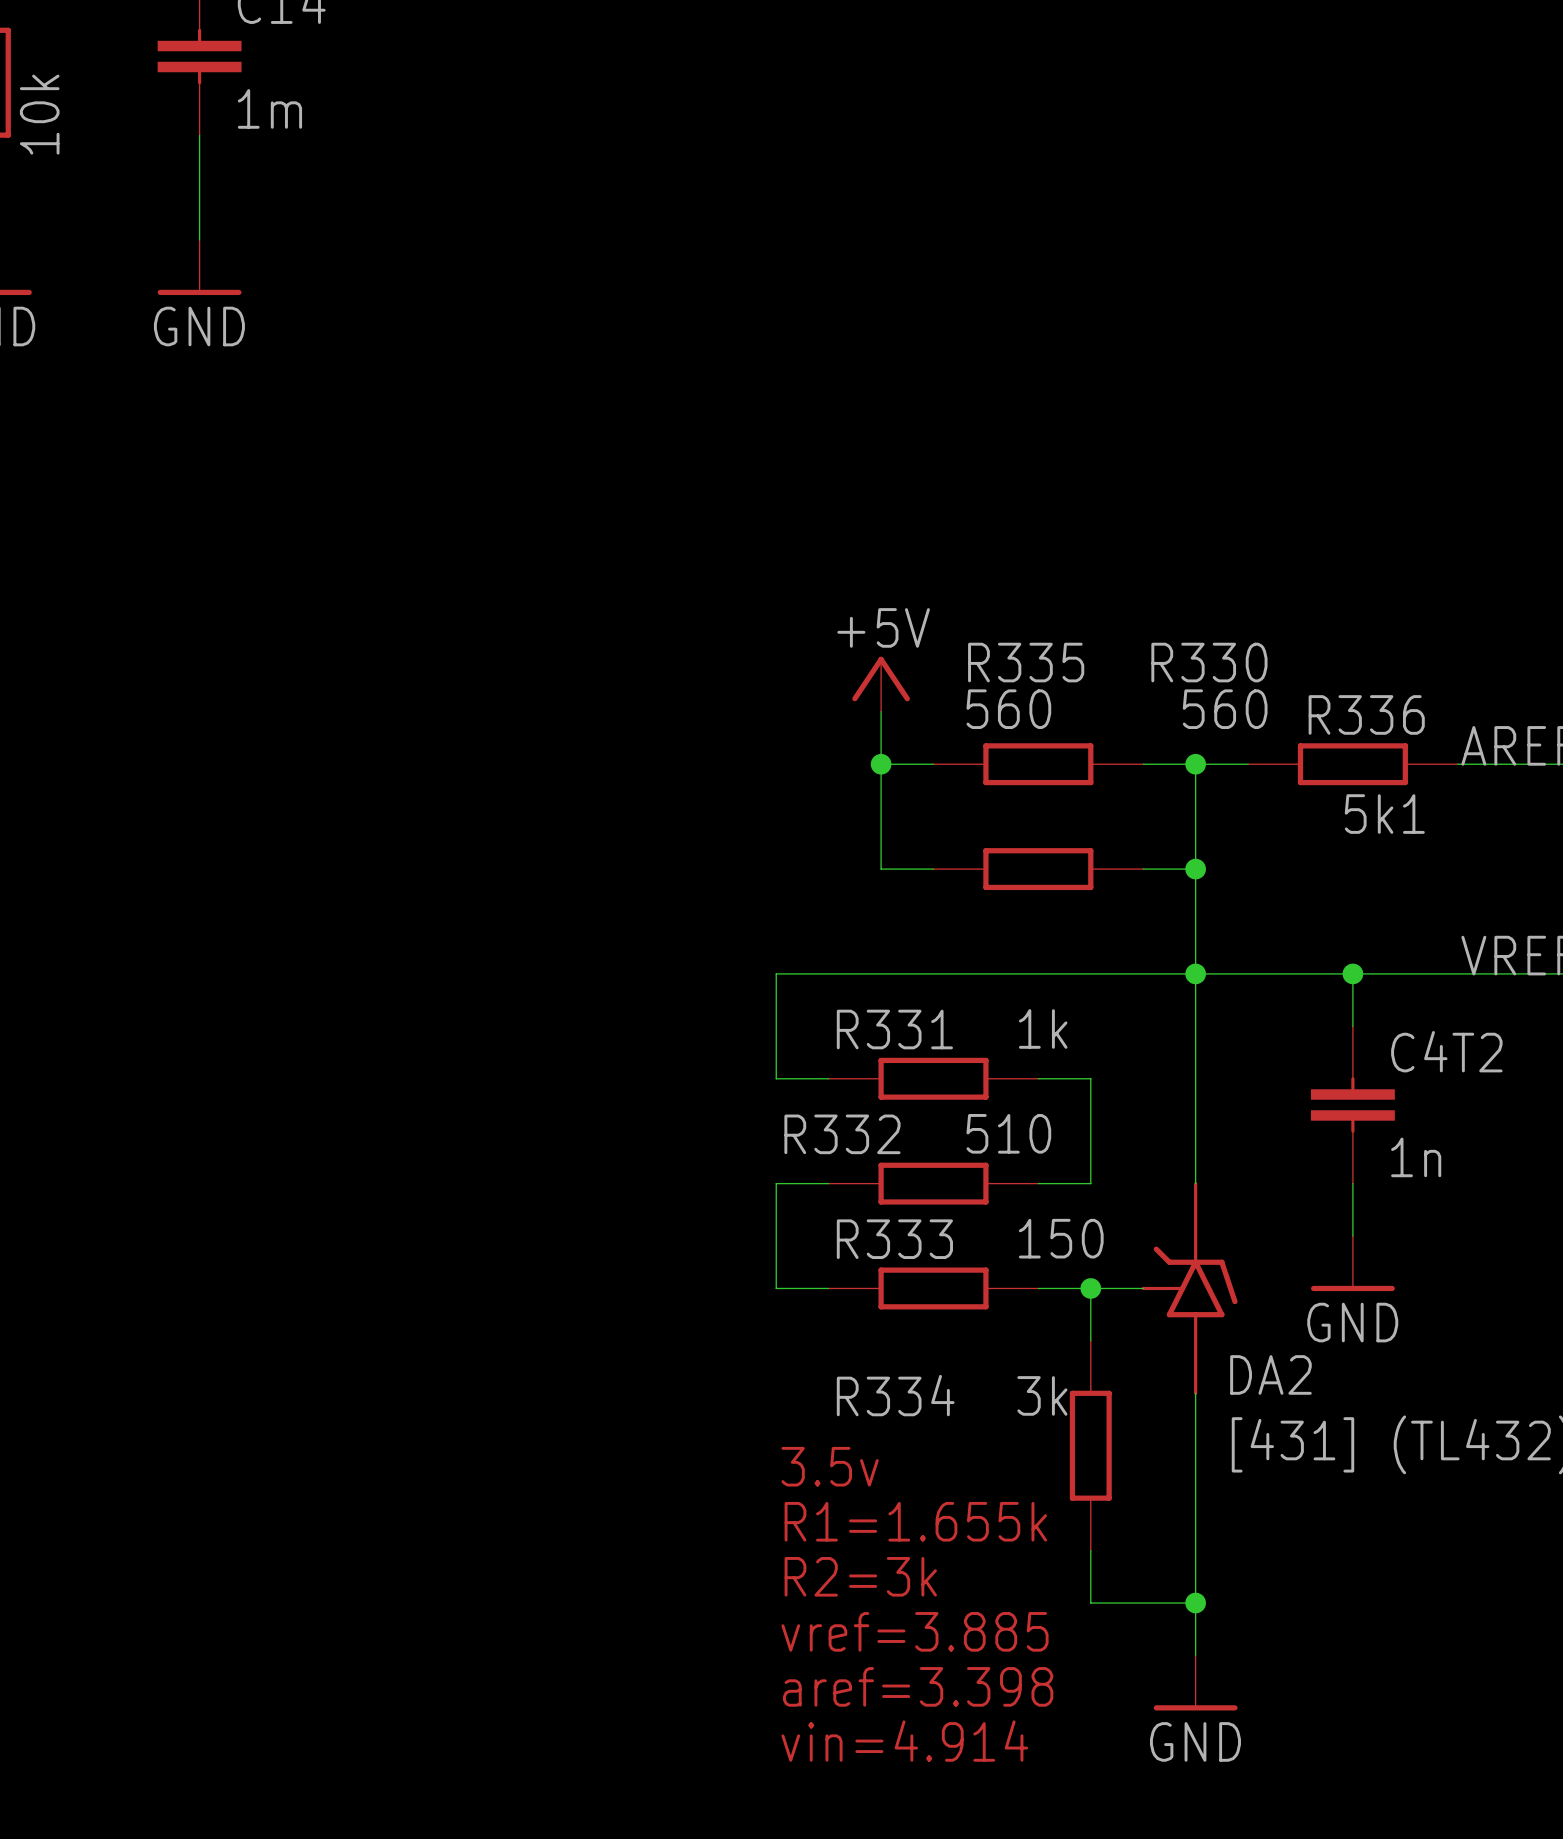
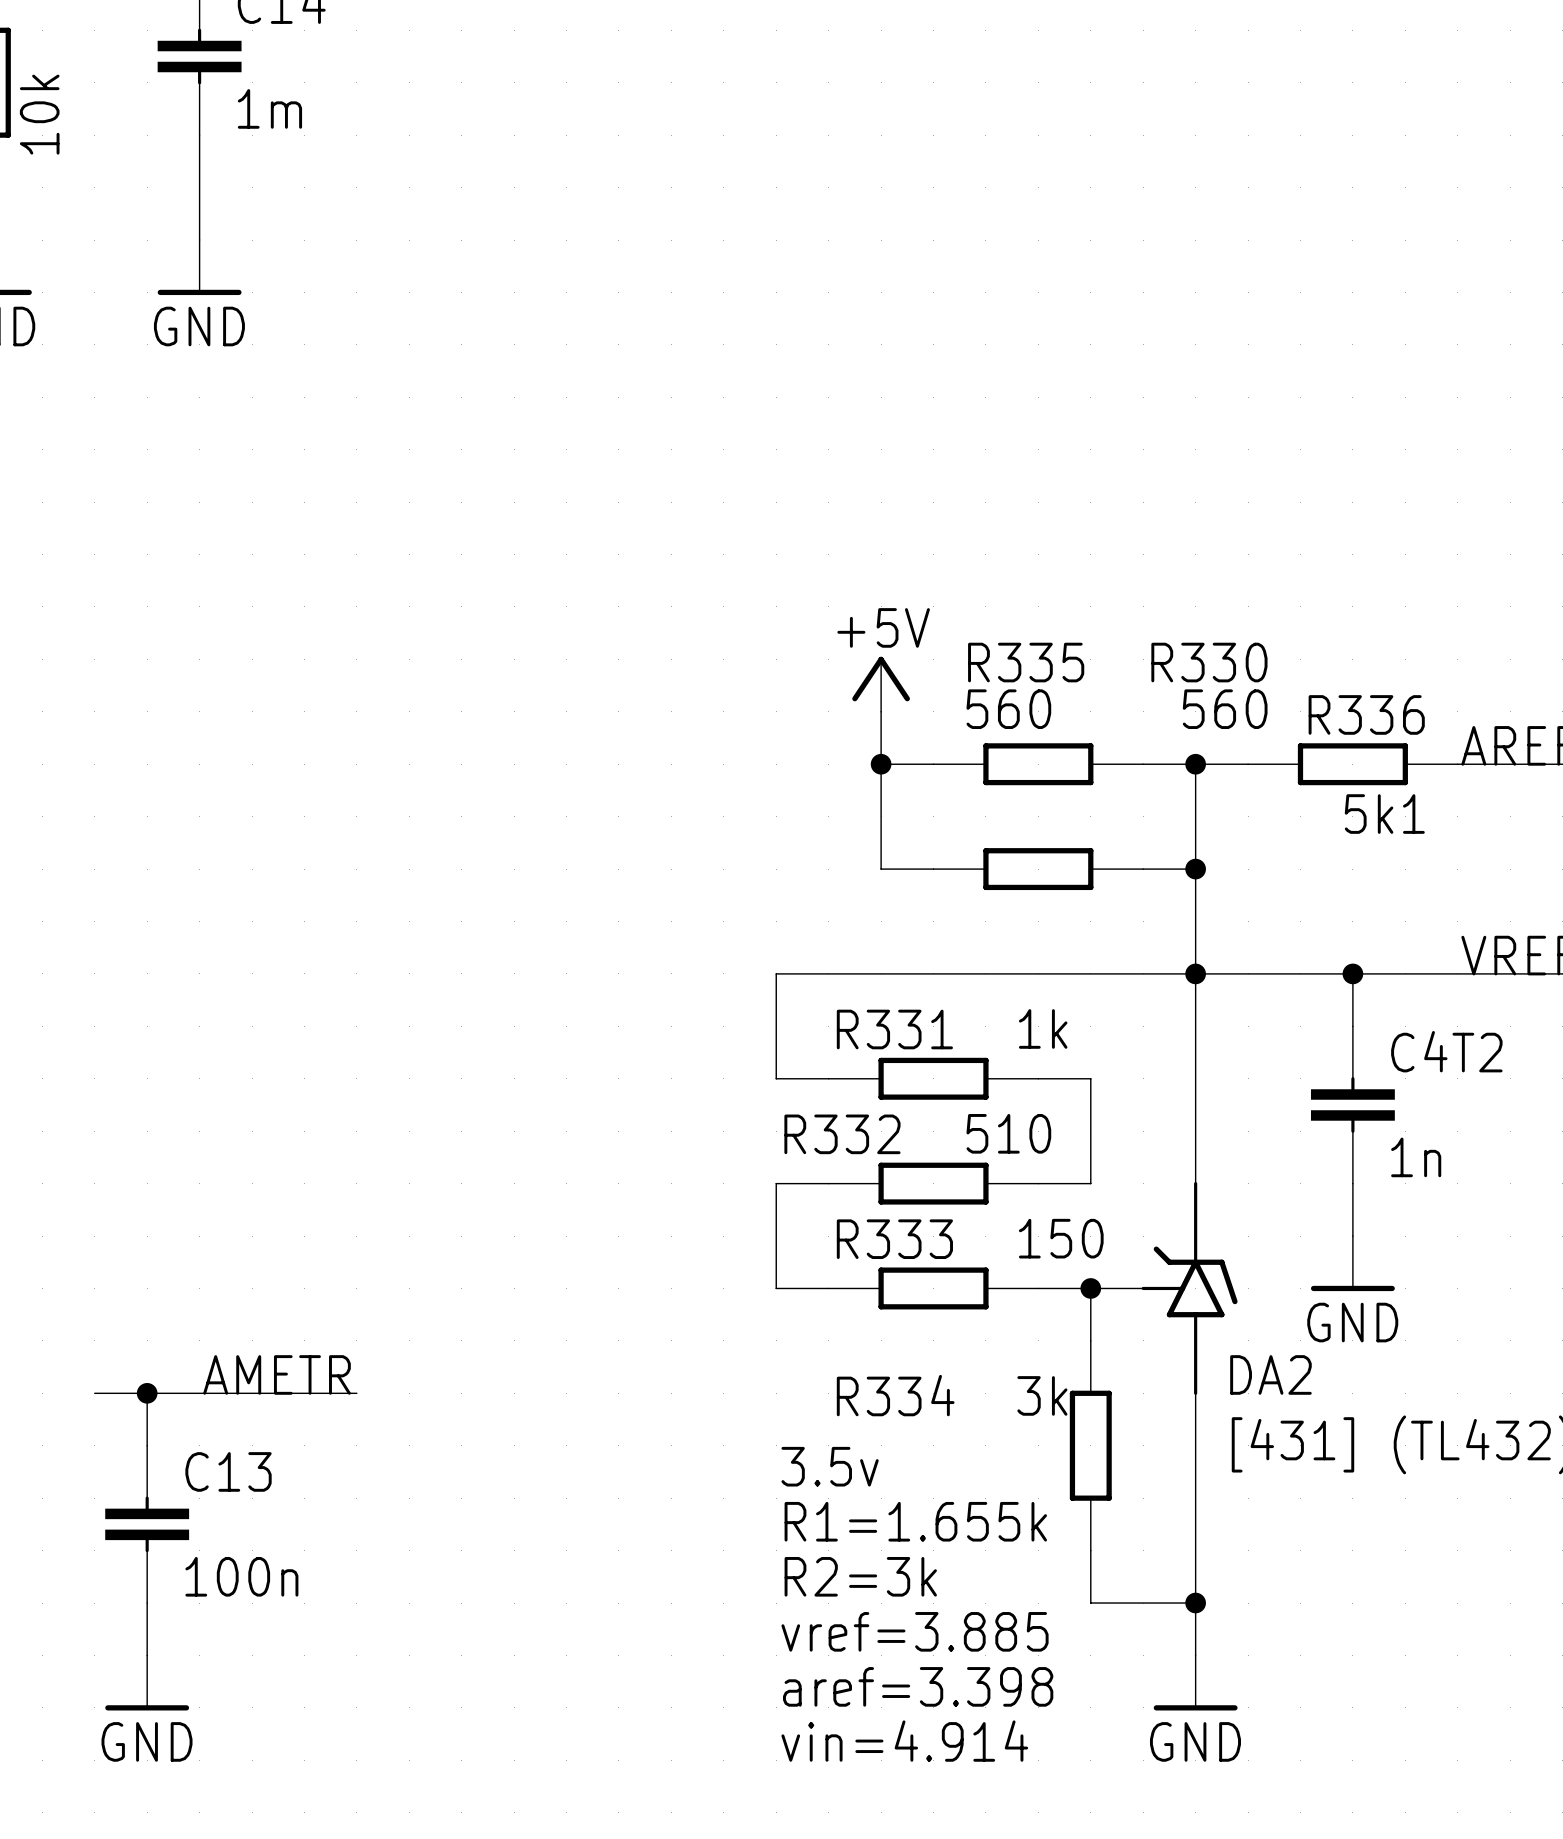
label: none -> AMETR (277, 1374)
wire: none -> (94, 1393) (356, 1393)
wire: none -> (147, 1393) (147, 1445)
junction: none -> (147, 1393)
C13: none -> 100n (147, 1524)
wire: none -> (147, 1603) (147, 1655)
power symbol: none -> GND (147, 1682)

